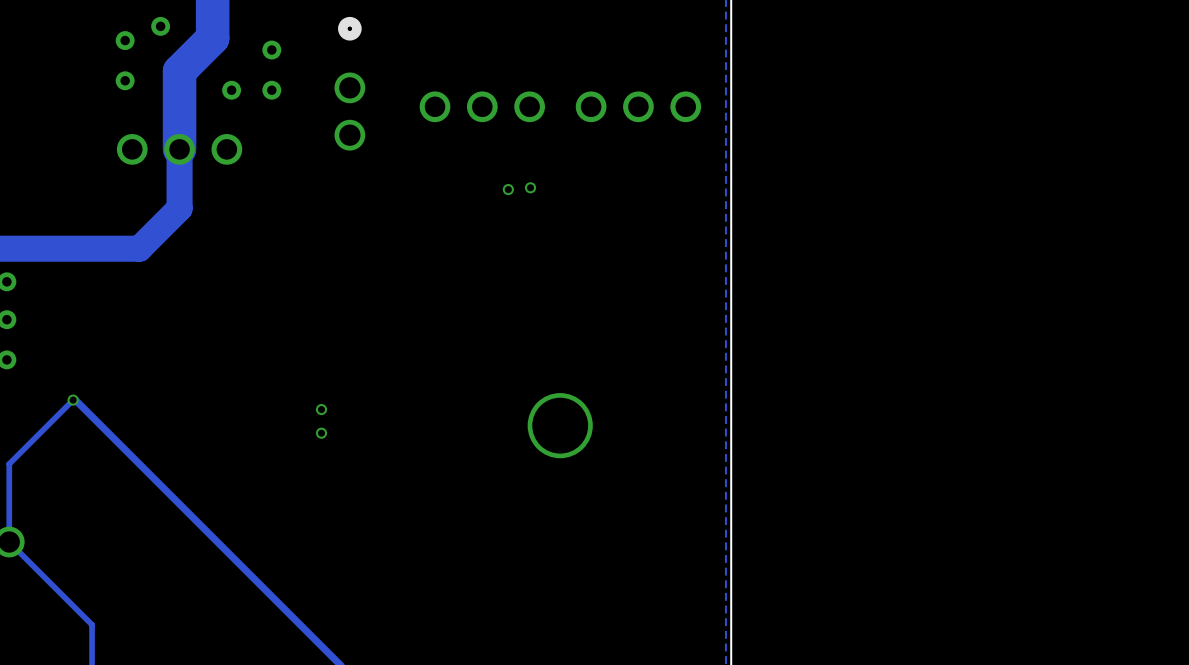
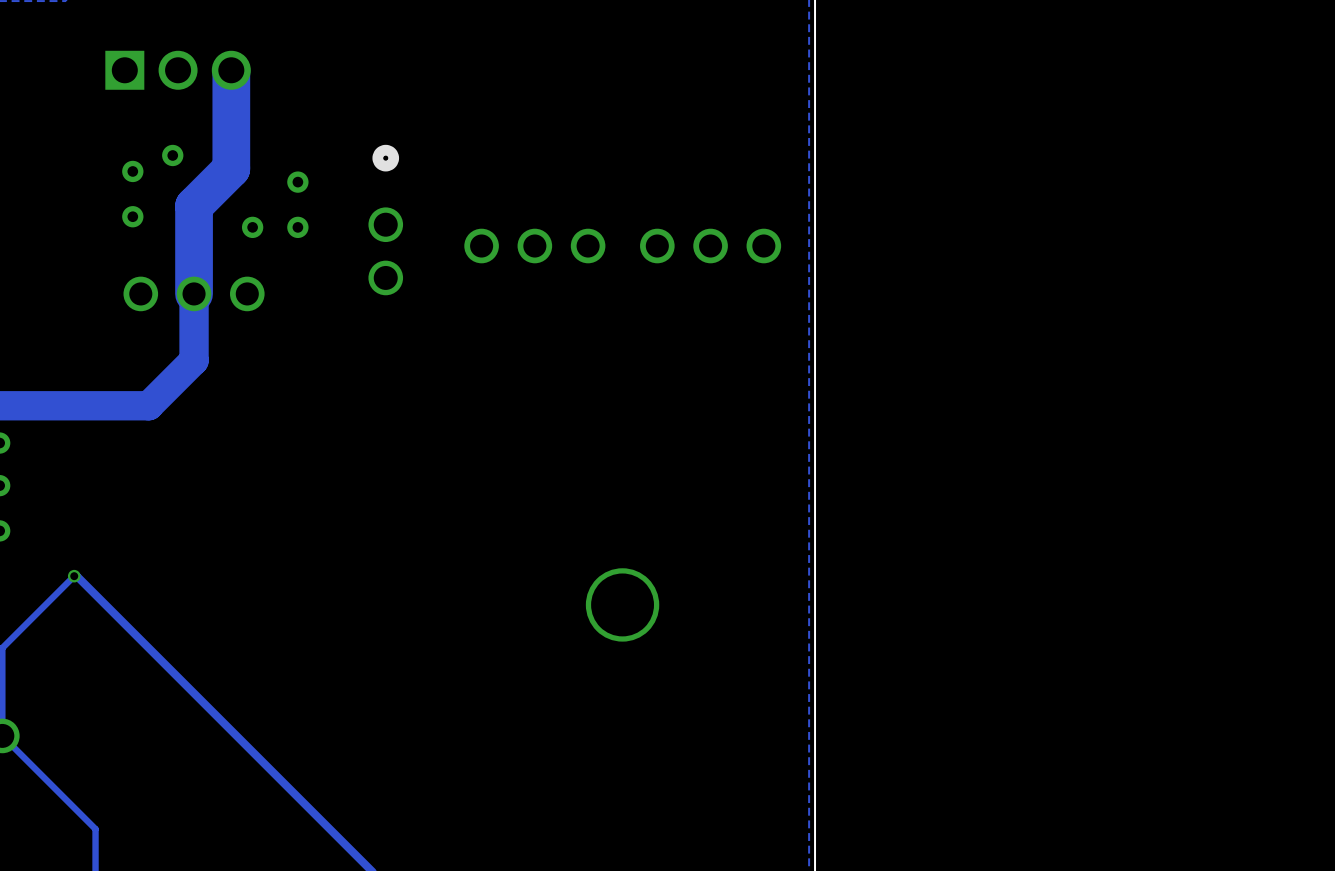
via: (530, 187) -> none
via: (508, 189) -> none
via: (321, 409) -> none
via: (321, 433) -> none

